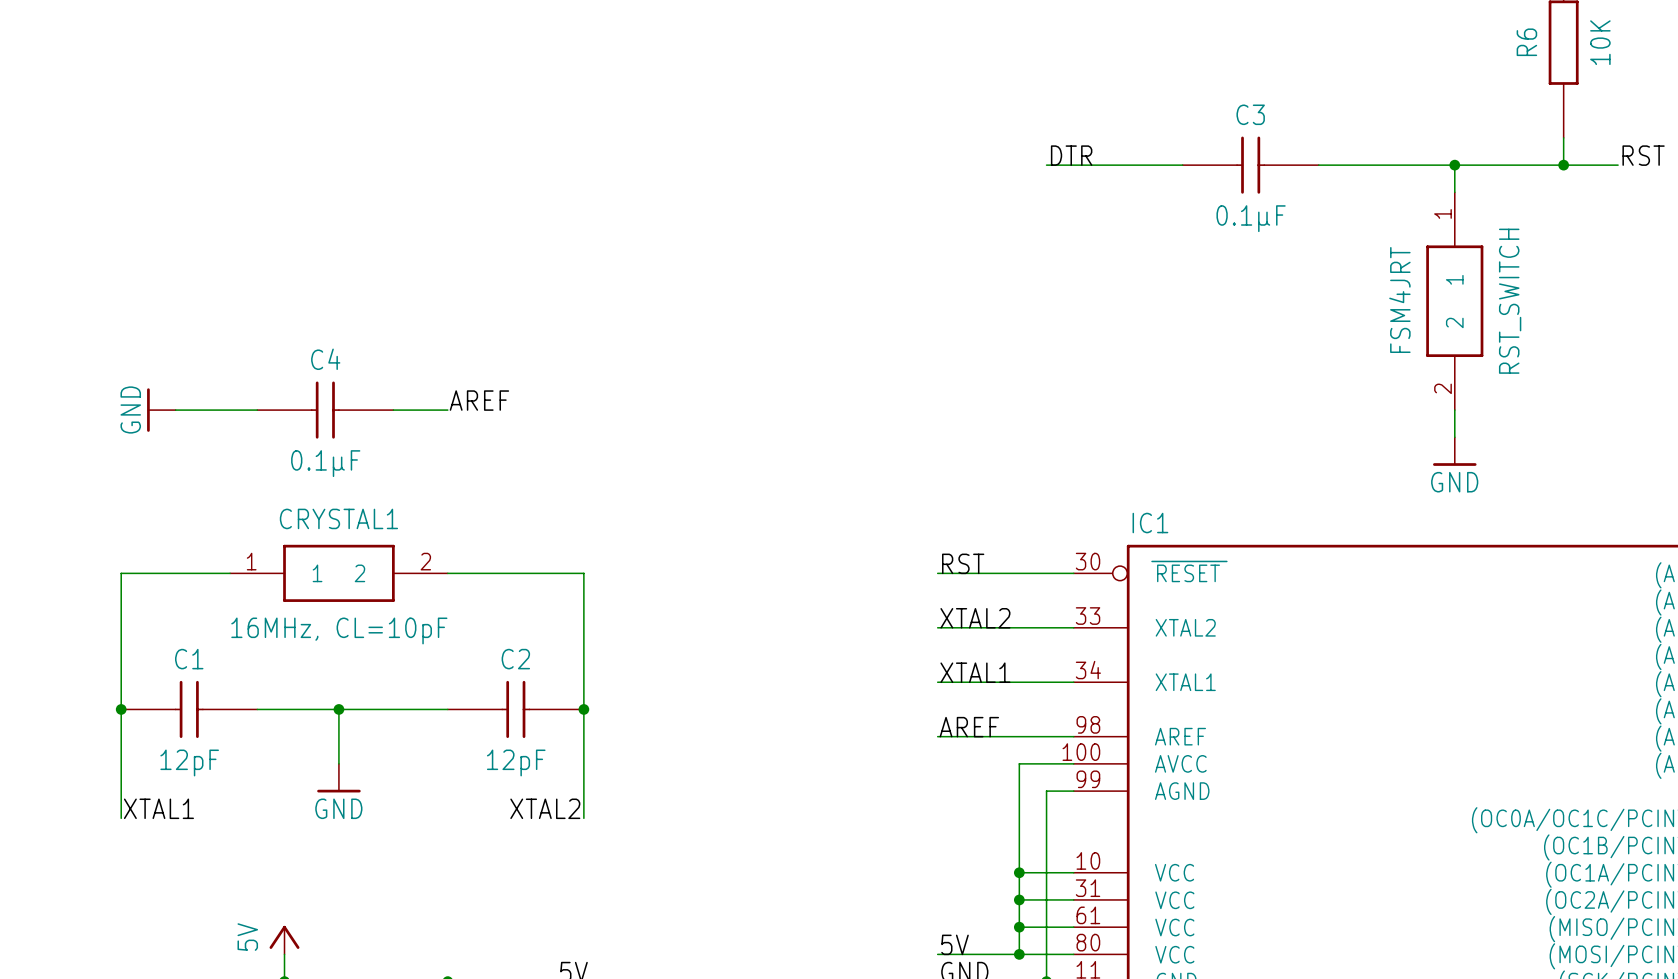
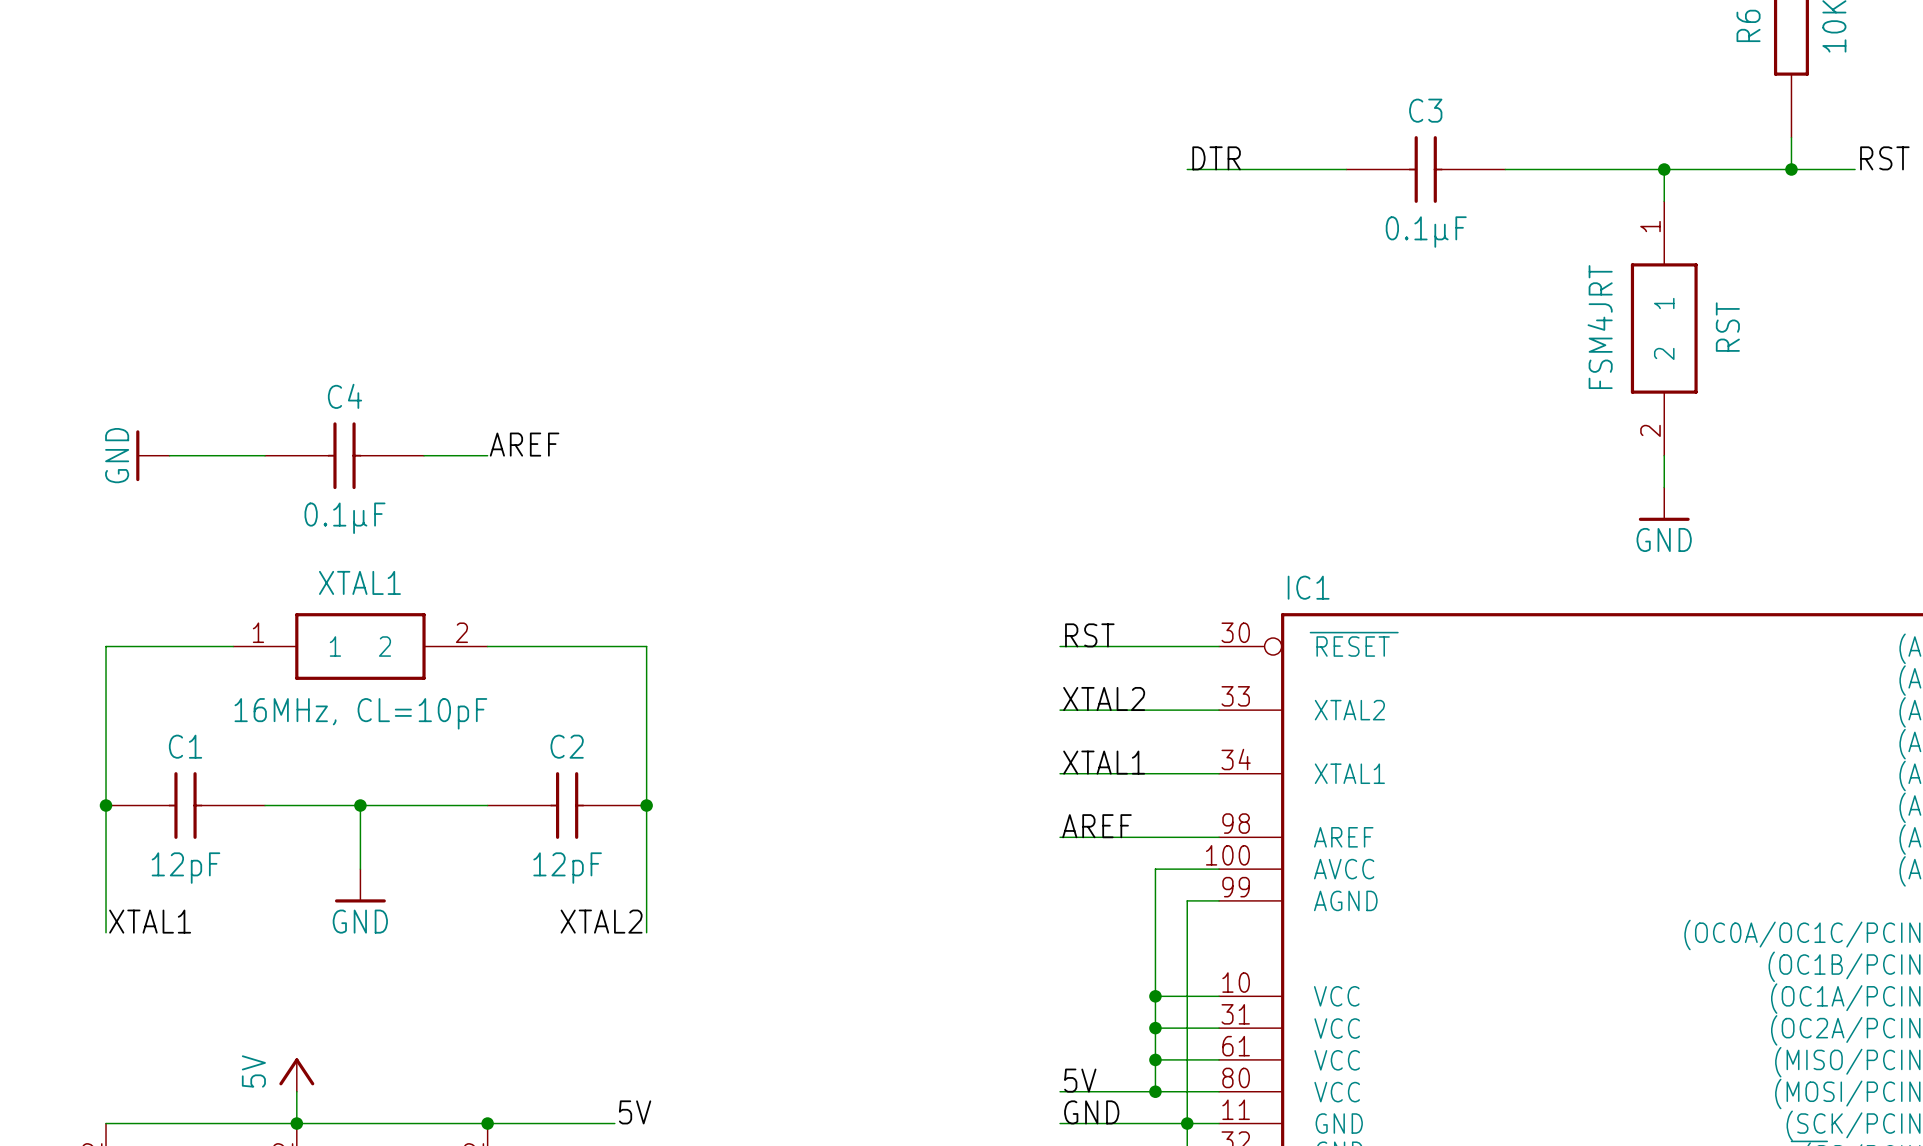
RST_SWITCH name: RST_SWITCH (1510, 301) -> RST (1727, 327)
CRYSTAL1 name: CRYSTAL1 (338, 518) -> XTAL1 (359, 582)

